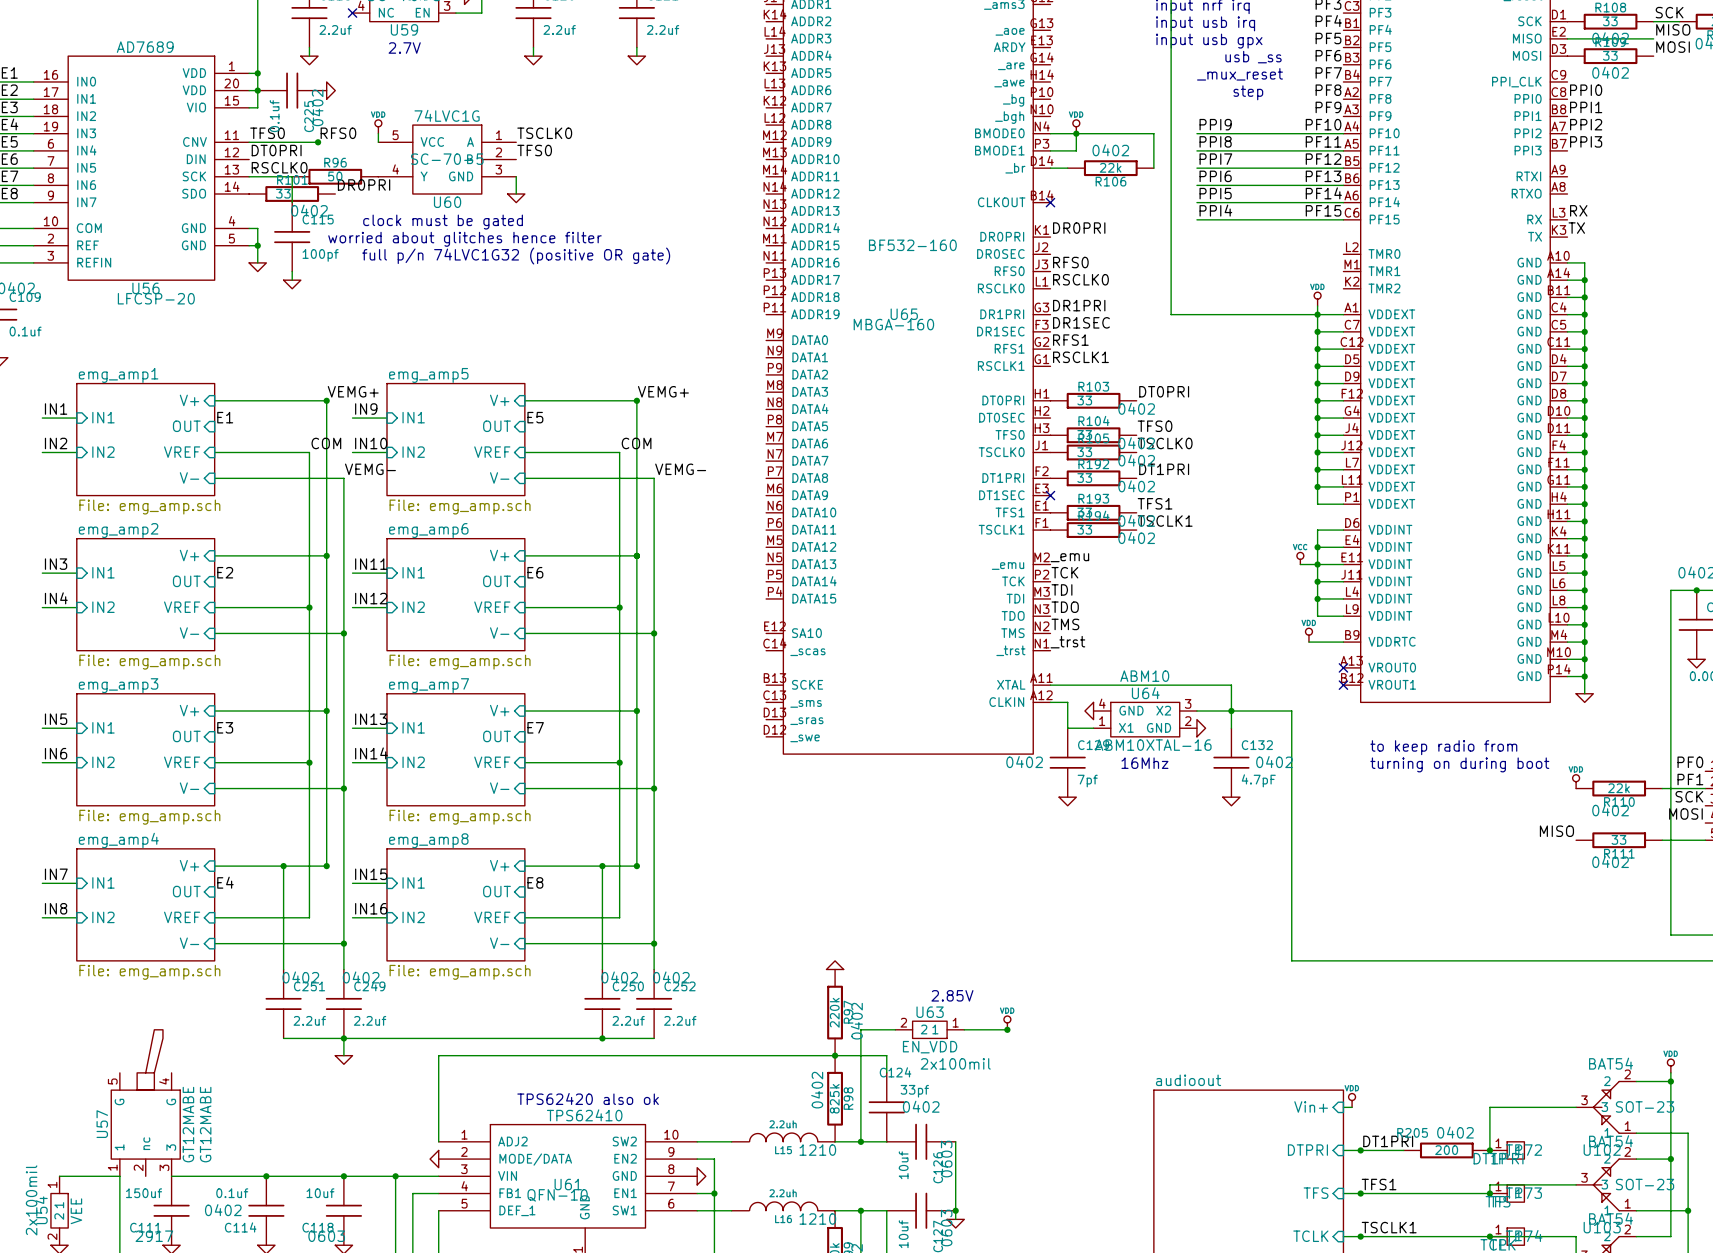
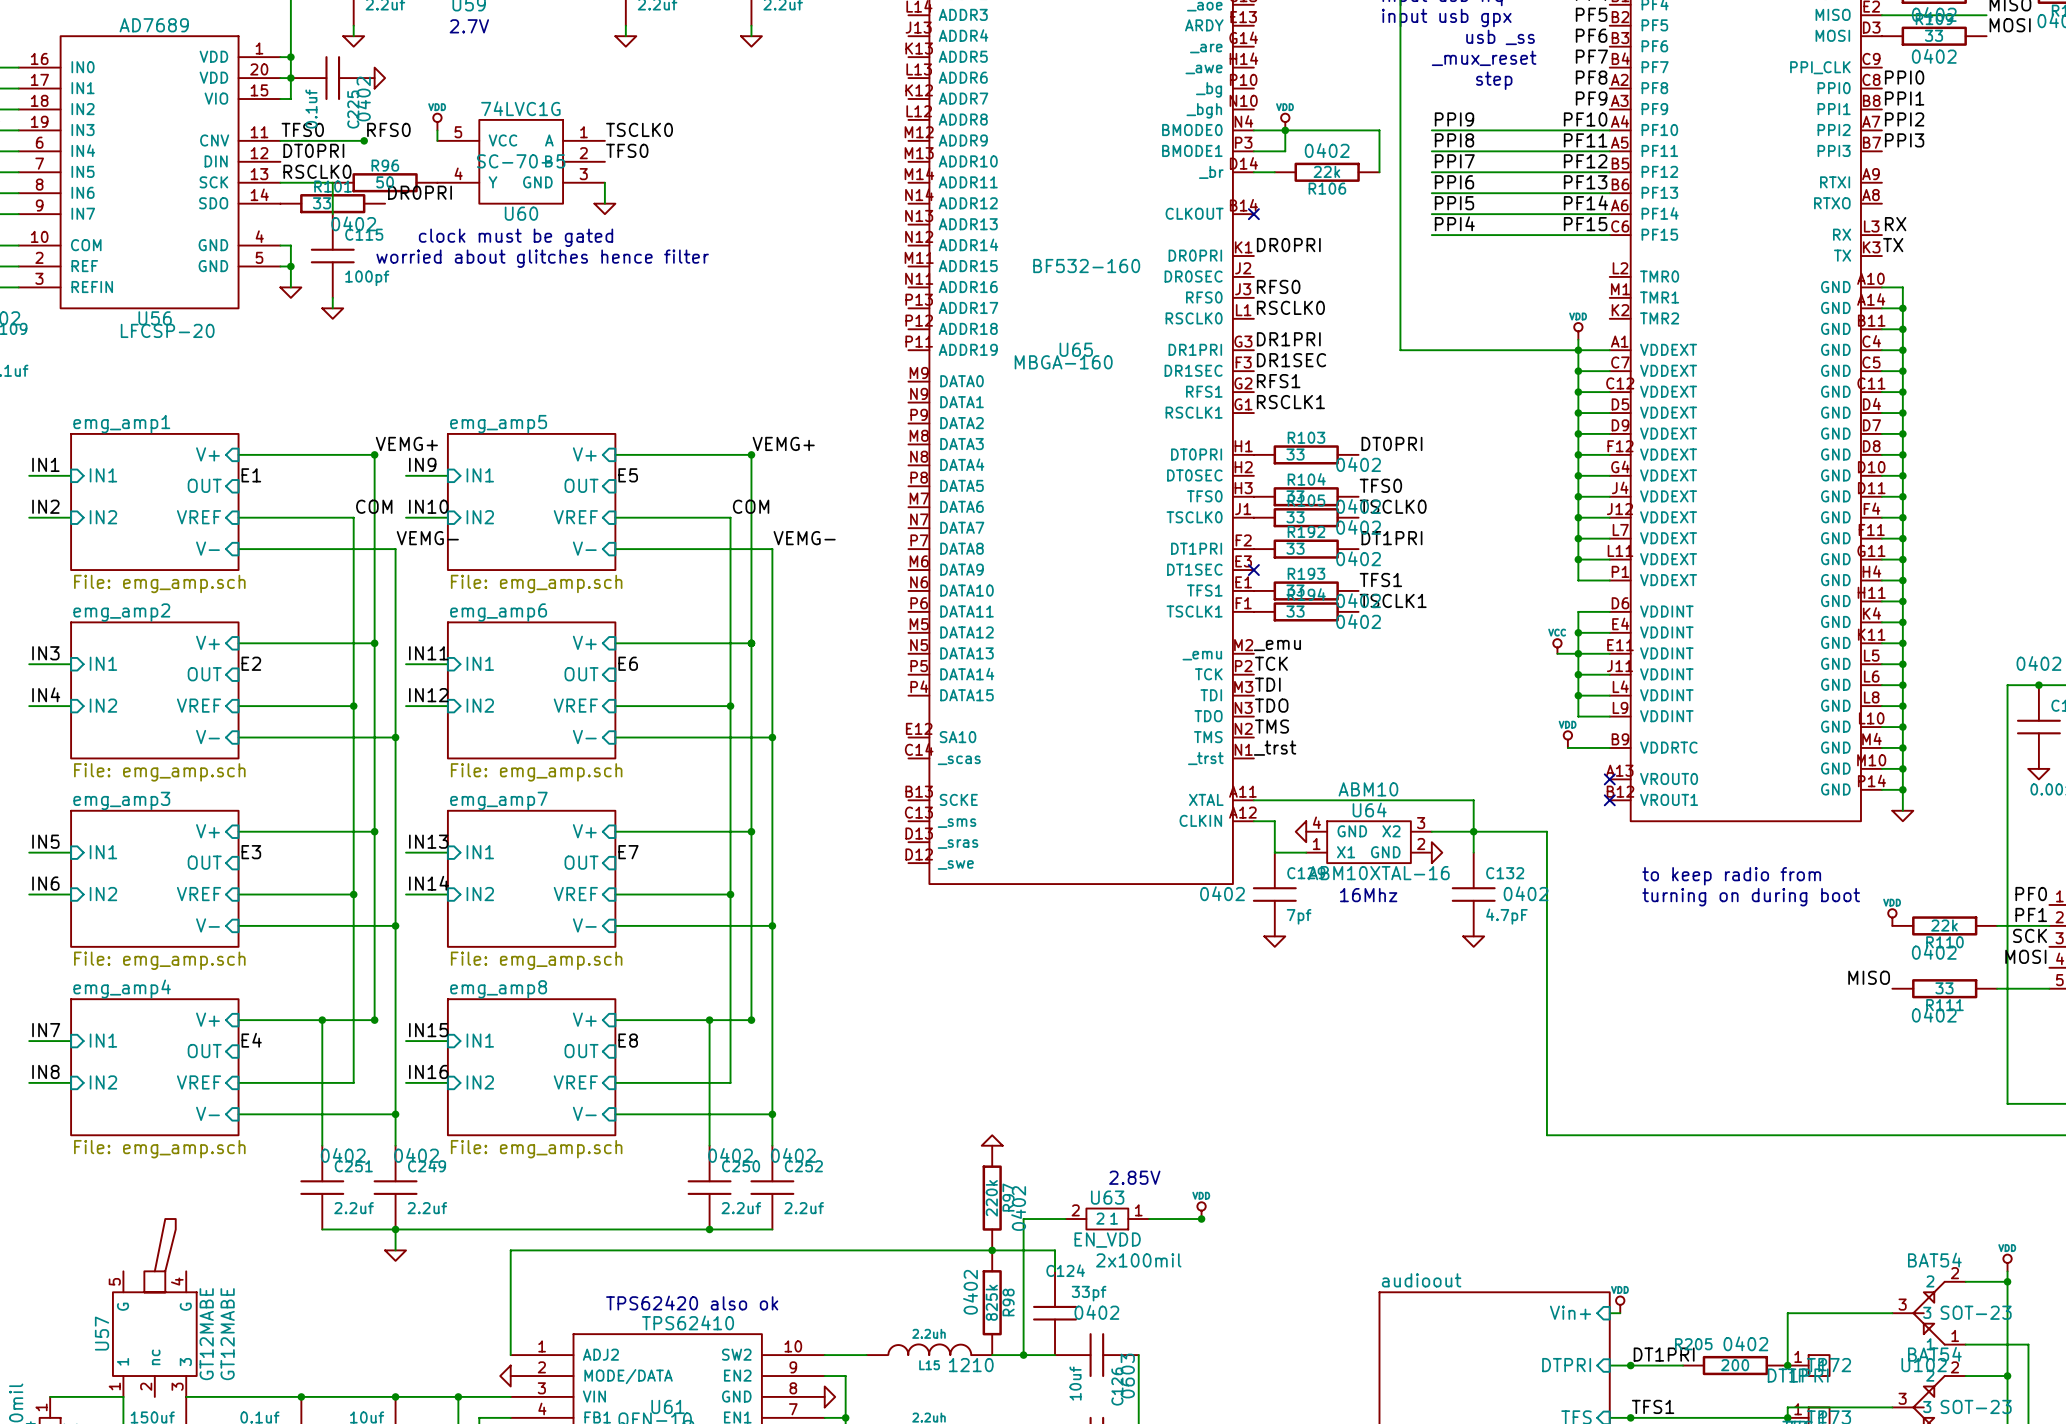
text: full p/n 74LVC1G32 (positive OR gate) (516, 256) -> none

